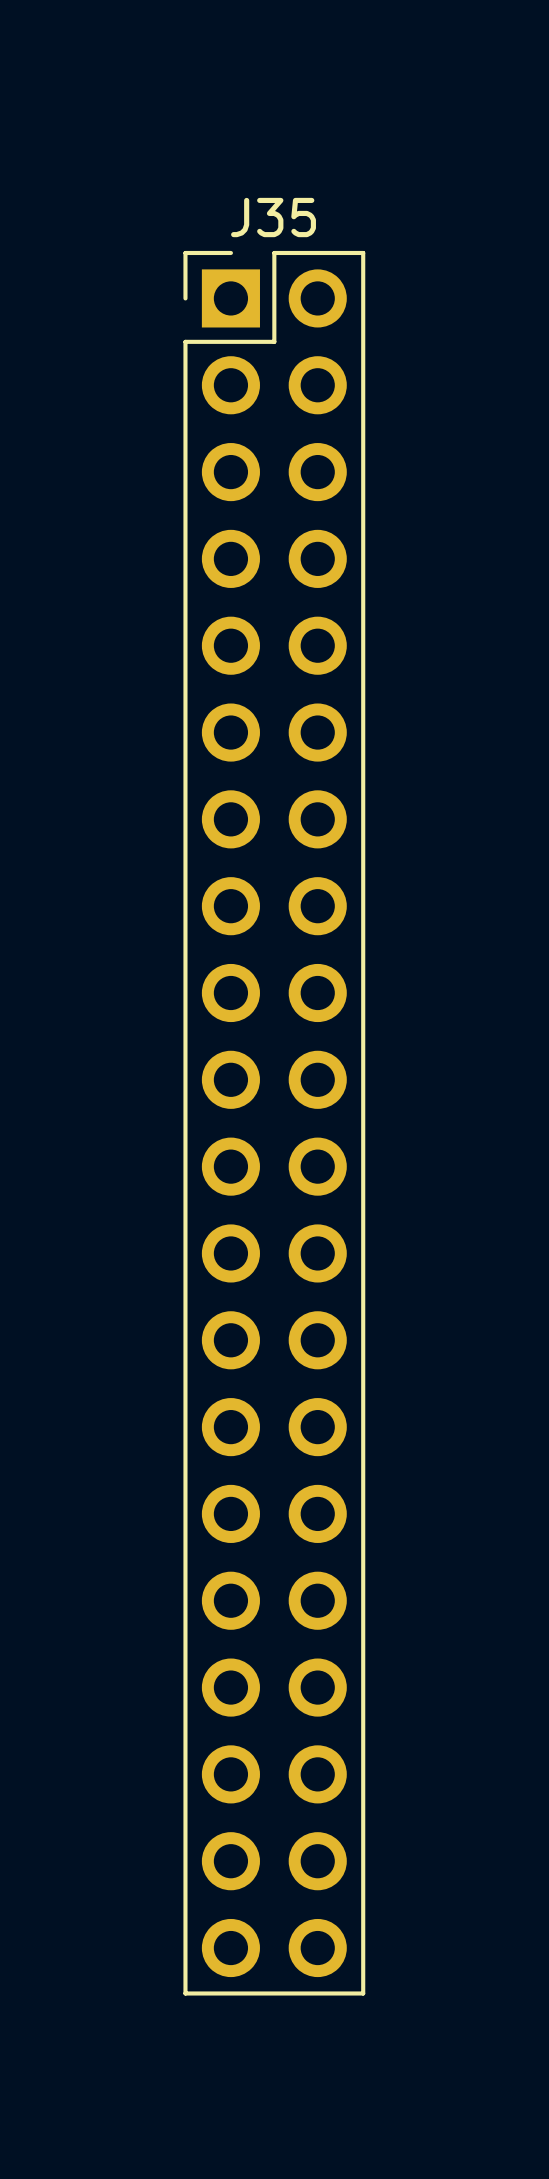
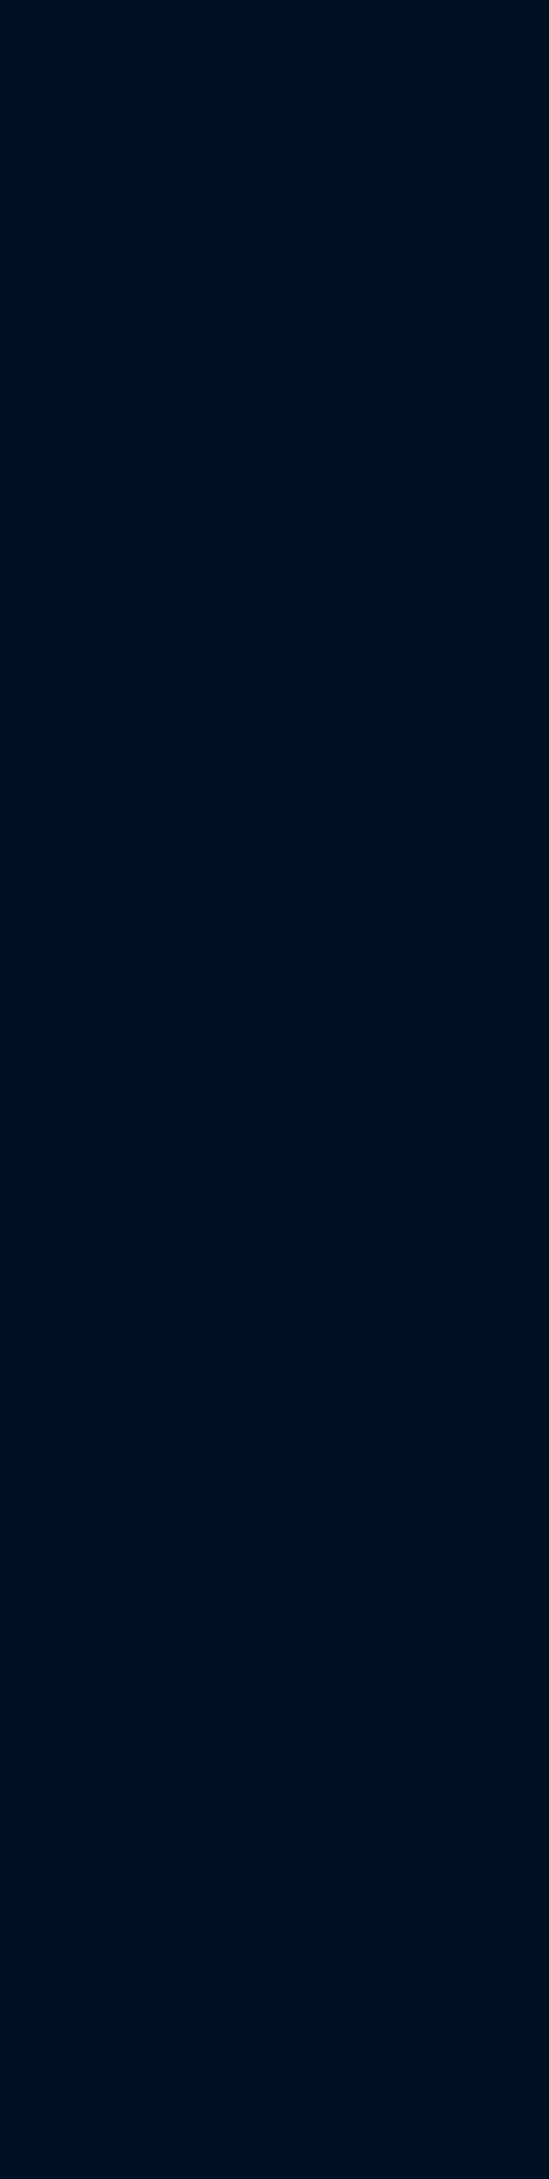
J35: (274, 1123) -> none

